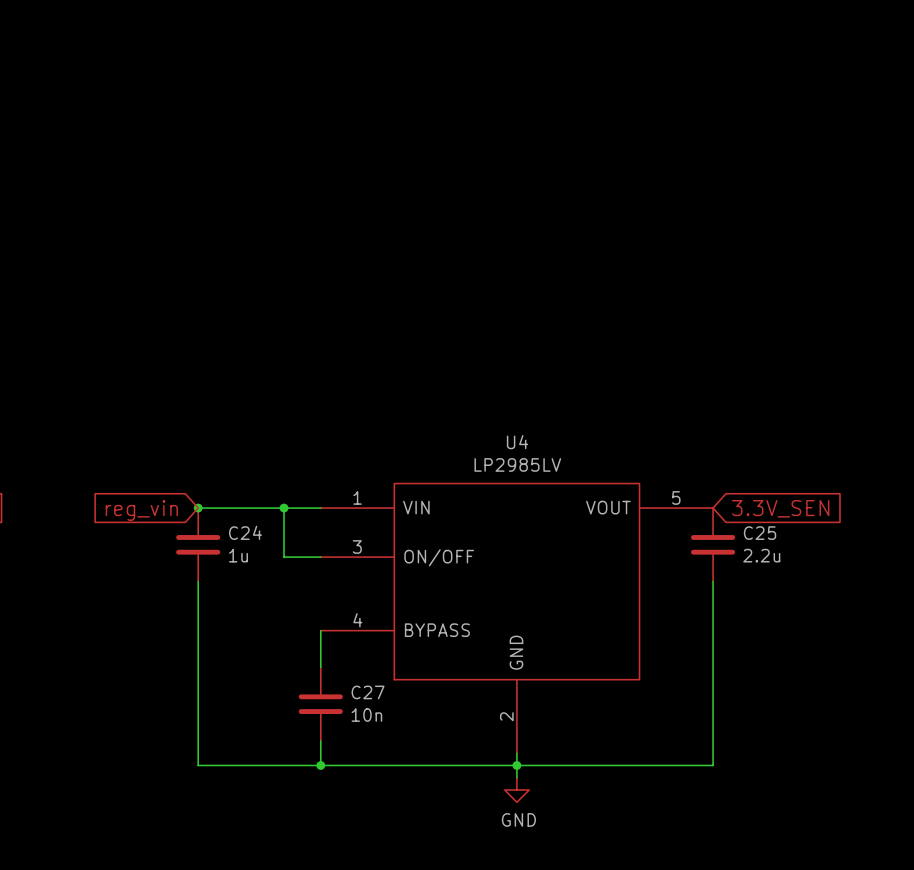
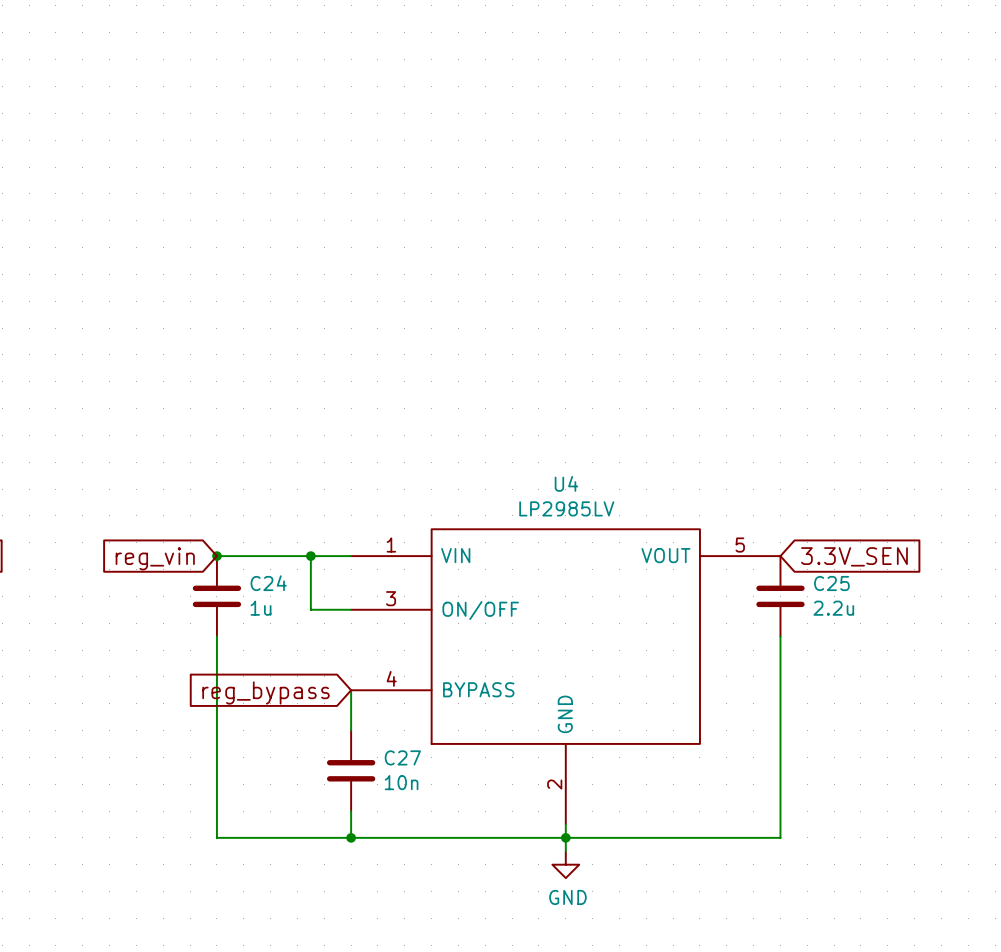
global label: none -> reg_bypass (266, 692)

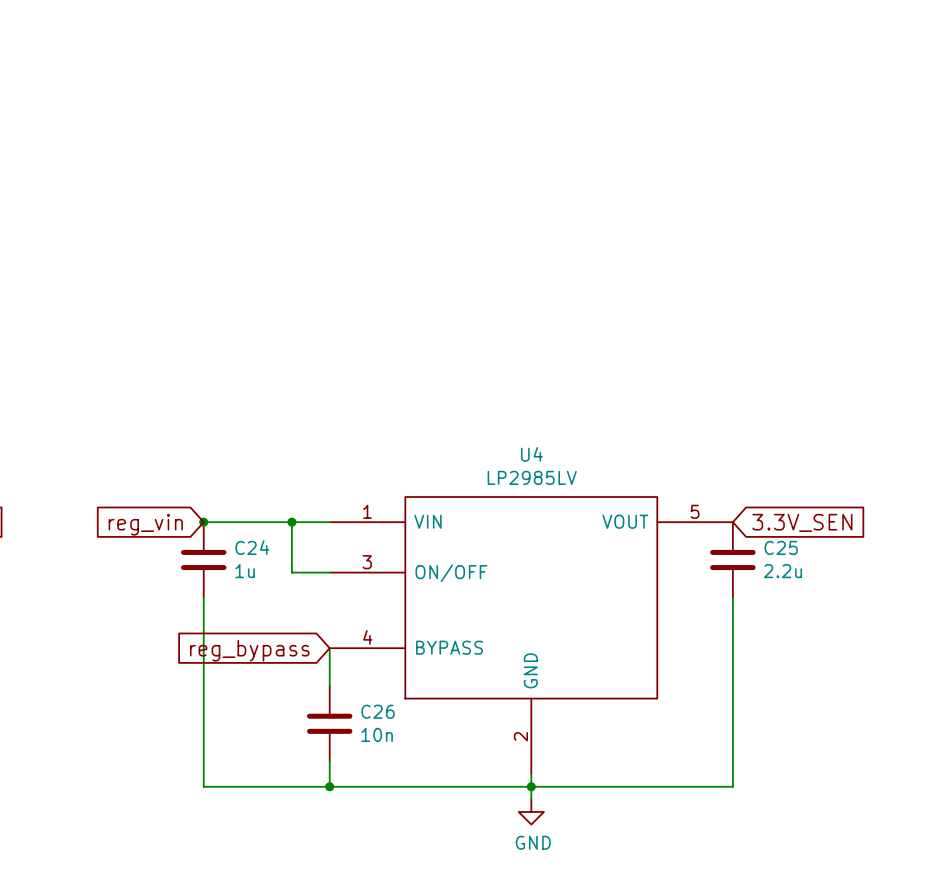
C27 name: C27 (402, 757) -> C26 (377, 711)

